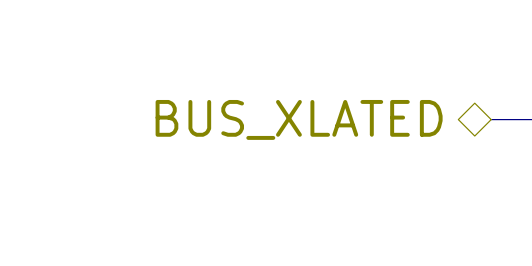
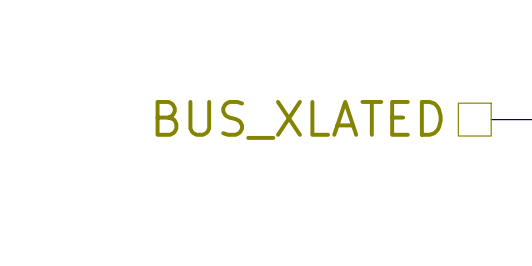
hierarchical label shape: bidirectional (299, 119) -> passive (299, 119)

